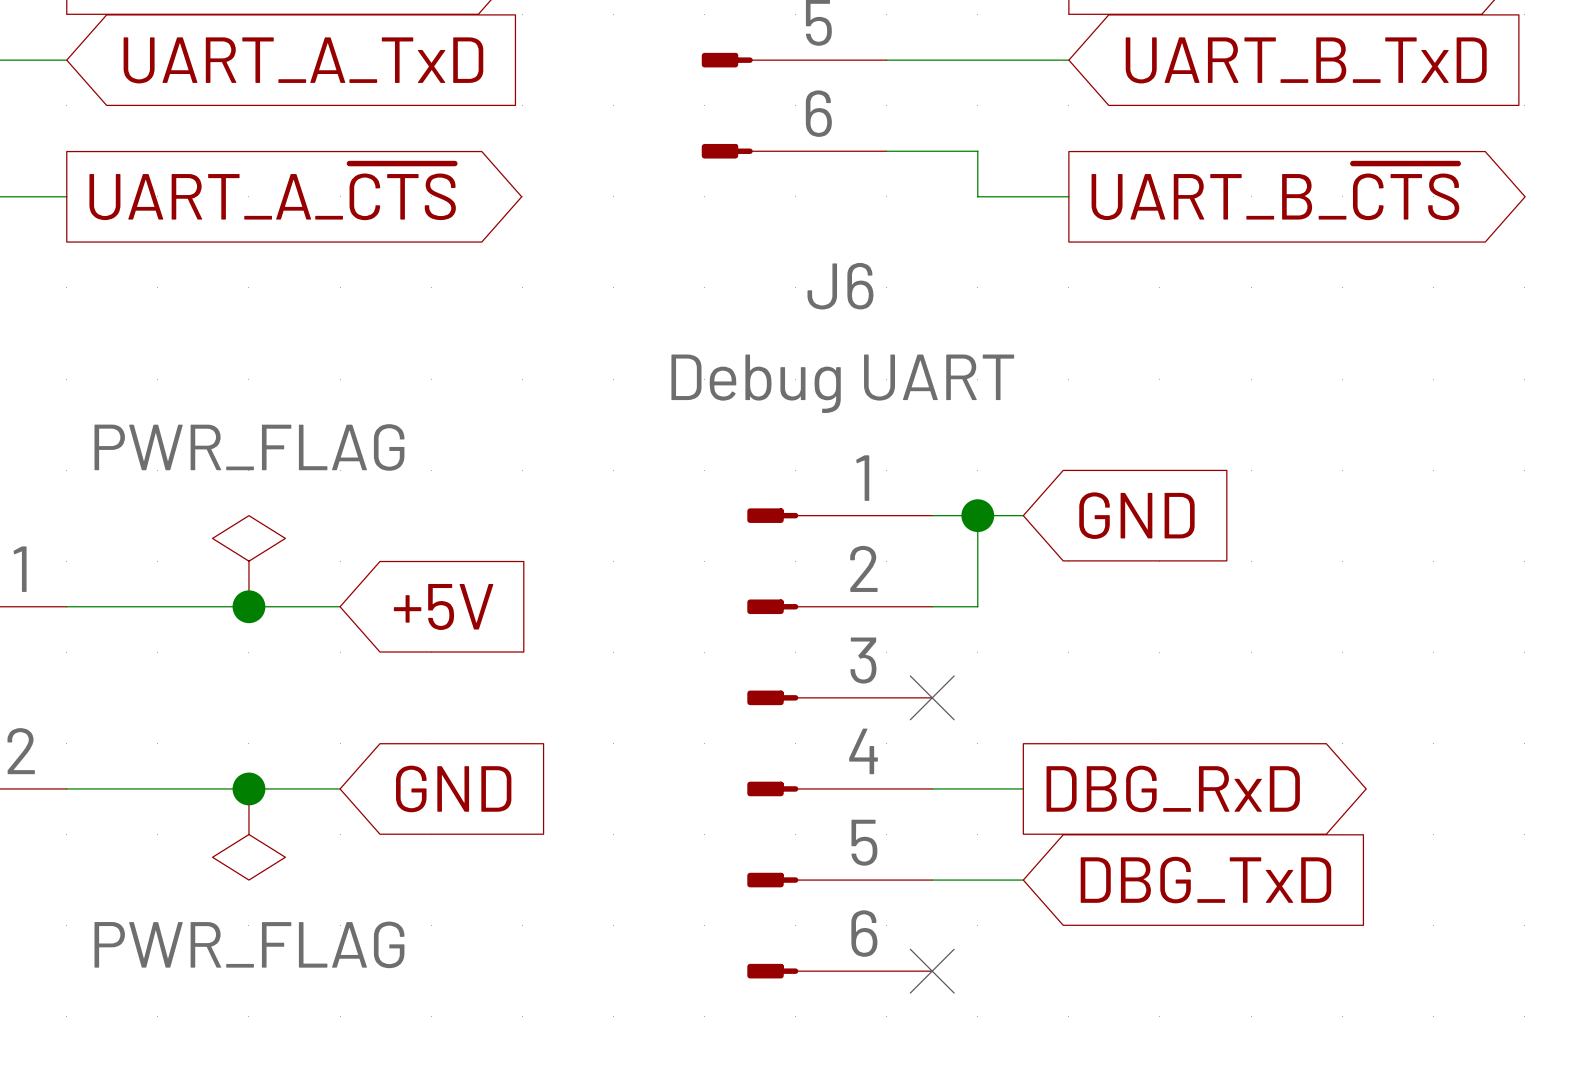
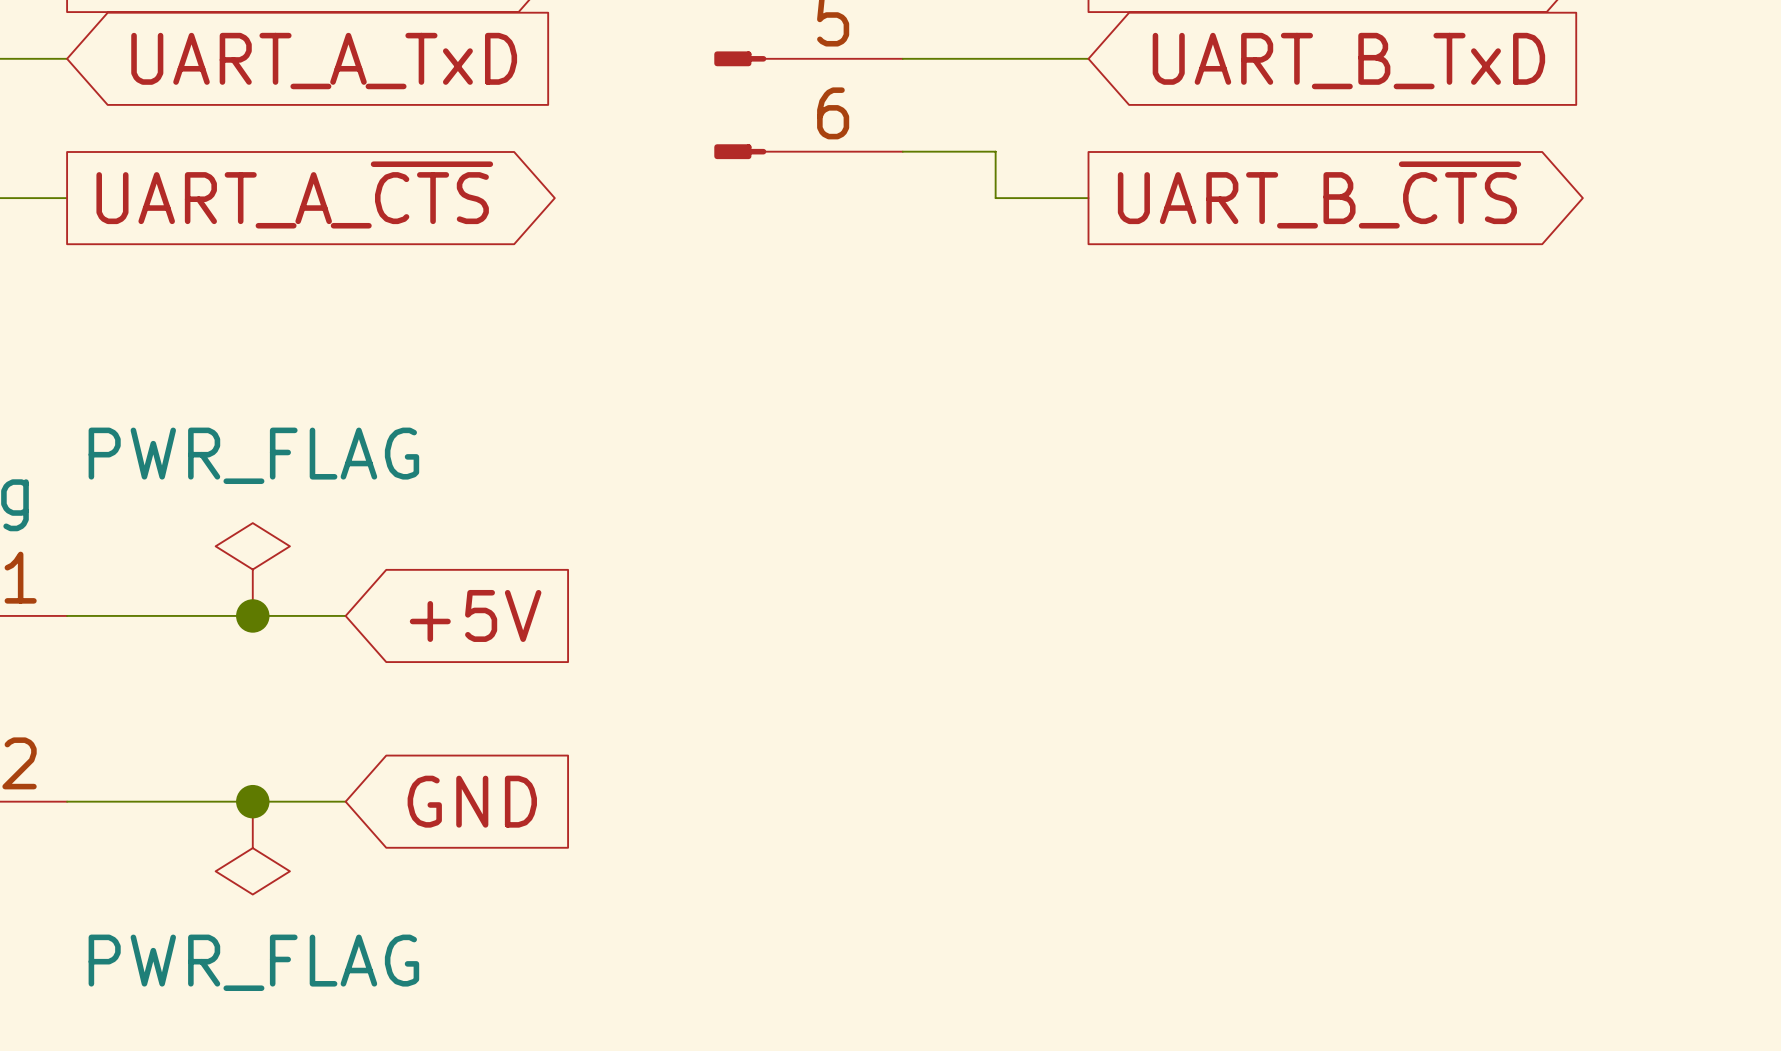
wire: (932, 515) (1023, 515) -> none
wire: (977, 515) (977, 606) (932, 606) -> none
junction: (977, 515) -> none
global label: GND (1136, 515) -> none
no-connect mark: (932, 697) -> none
J6: Debug UART (839, 743) -> none
wire: (932, 788) (1023, 788) -> none
global label: DBG_RxD (1173, 788) -> none
wire: (932, 880) (1023, 880) -> none
global label: DBG_TxD (1205, 880) -> none
no-connect mark: (932, 971) -> none

